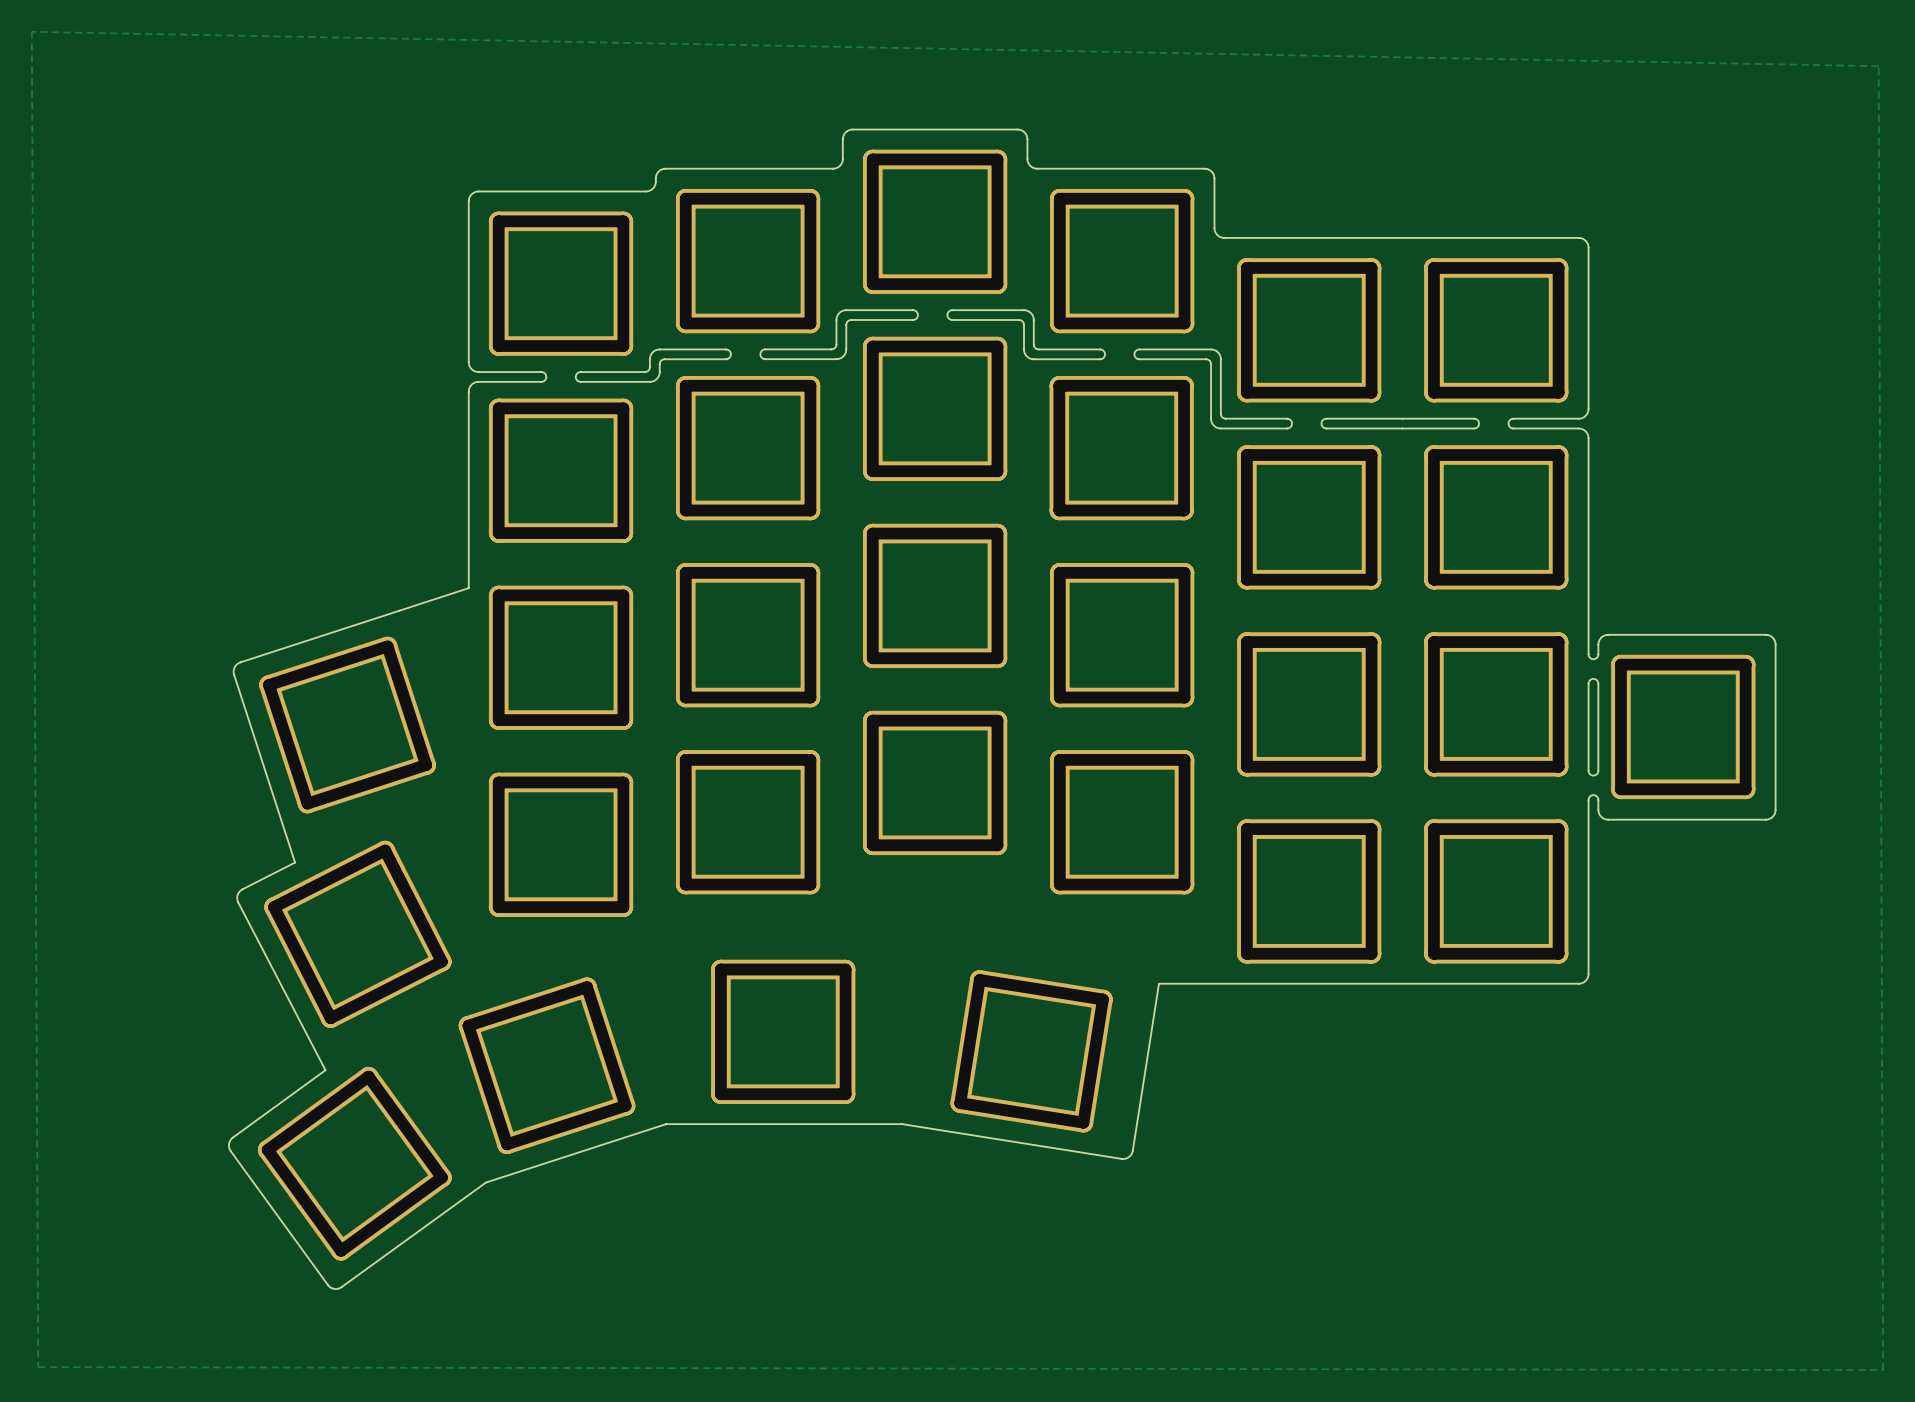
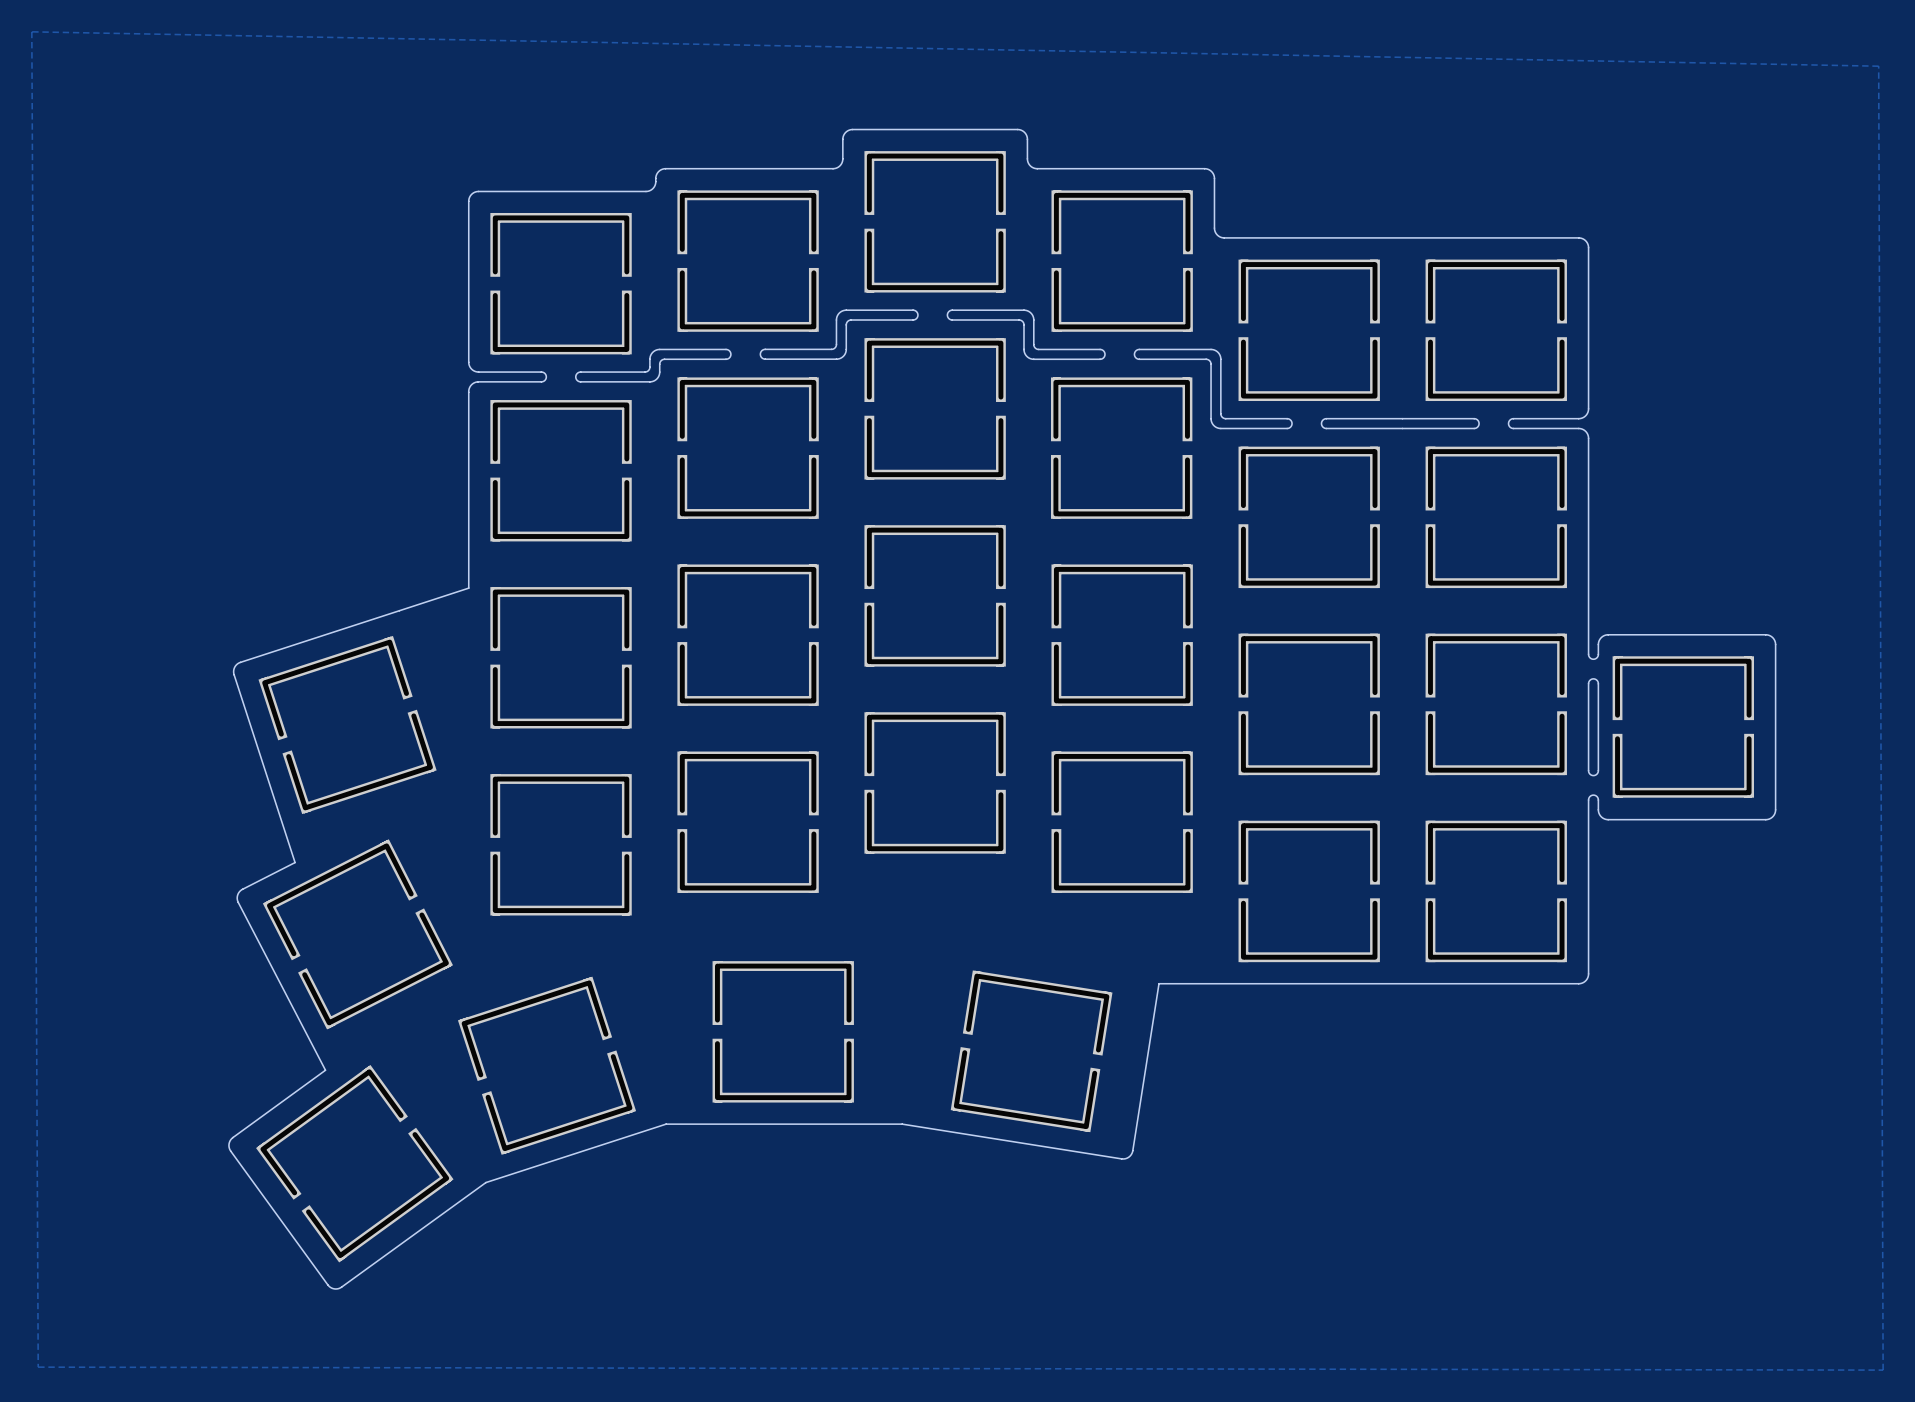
part footprint: [862, 149, 1008, 295] -> [864, 151, 1006, 293]
part footprint: [675, 188, 821, 334] -> [677, 190, 819, 332]
part footprint: [1050, 188, 1195, 334] -> [1051, 190, 1193, 332]
part footprint: [488, 211, 634, 356] -> [490, 212, 632, 355]
part footprint: [1237, 258, 1382, 403] -> [1238, 259, 1380, 402]
part footprint: [1424, 258, 1569, 403] -> [1425, 259, 1567, 402]
part footprint: [862, 336, 1008, 482] -> [864, 338, 1006, 480]
part footprint: [675, 375, 821, 521] -> [677, 377, 819, 519]
part footprint: [1049, 375, 1194, 521] -> [1050, 377, 1193, 519]
part footprint: [488, 398, 634, 543] -> [490, 400, 632, 542]
part footprint: [1237, 445, 1382, 590] -> [1238, 446, 1380, 589]
part footprint: [1424, 445, 1569, 590] -> [1425, 446, 1567, 589]
part footprint: [862, 523, 1008, 669] -> [864, 525, 1006, 667]
part footprint: [675, 563, 821, 708] -> [677, 564, 819, 706]
part footprint: [1050, 563, 1195, 708] -> [1051, 564, 1193, 706]
part footprint: [488, 585, 634, 731] -> [490, 587, 632, 729]
part footprint: [1237, 632, 1382, 777] -> [1238, 633, 1380, 776]
part footprint: [1424, 632, 1569, 777] -> [1425, 633, 1567, 776]
part footprint: [259, 636, 436, 814] -> [258, 635, 437, 815]
part footprint: [1611, 654, 1756, 800] -> [1612, 656, 1755, 798]
part footprint: [862, 710, 1008, 856] -> [864, 712, 1006, 854]
part footprint: [675, 750, 821, 895] -> [677, 751, 819, 893]
part footprint: [1050, 750, 1195, 895] -> [1051, 751, 1193, 893]
part footprint: [488, 772, 634, 918] -> [490, 774, 632, 916]
part footprint: [1237, 819, 1382, 964] -> [1238, 820, 1380, 963]
part footprint: [1424, 819, 1569, 964] -> [1425, 820, 1567, 963]
part footprint: [264, 840, 452, 1029] -> [262, 839, 454, 1030]
part footprint: [711, 959, 856, 1105] -> [712, 961, 854, 1103]
part footprint: [950, 970, 1113, 1133] -> [950, 970, 1113, 1133]
part footprint: [458, 977, 636, 1155] -> [457, 976, 637, 1155]
part footprint: [257, 1066, 452, 1261] -> [256, 1064, 454, 1263]

